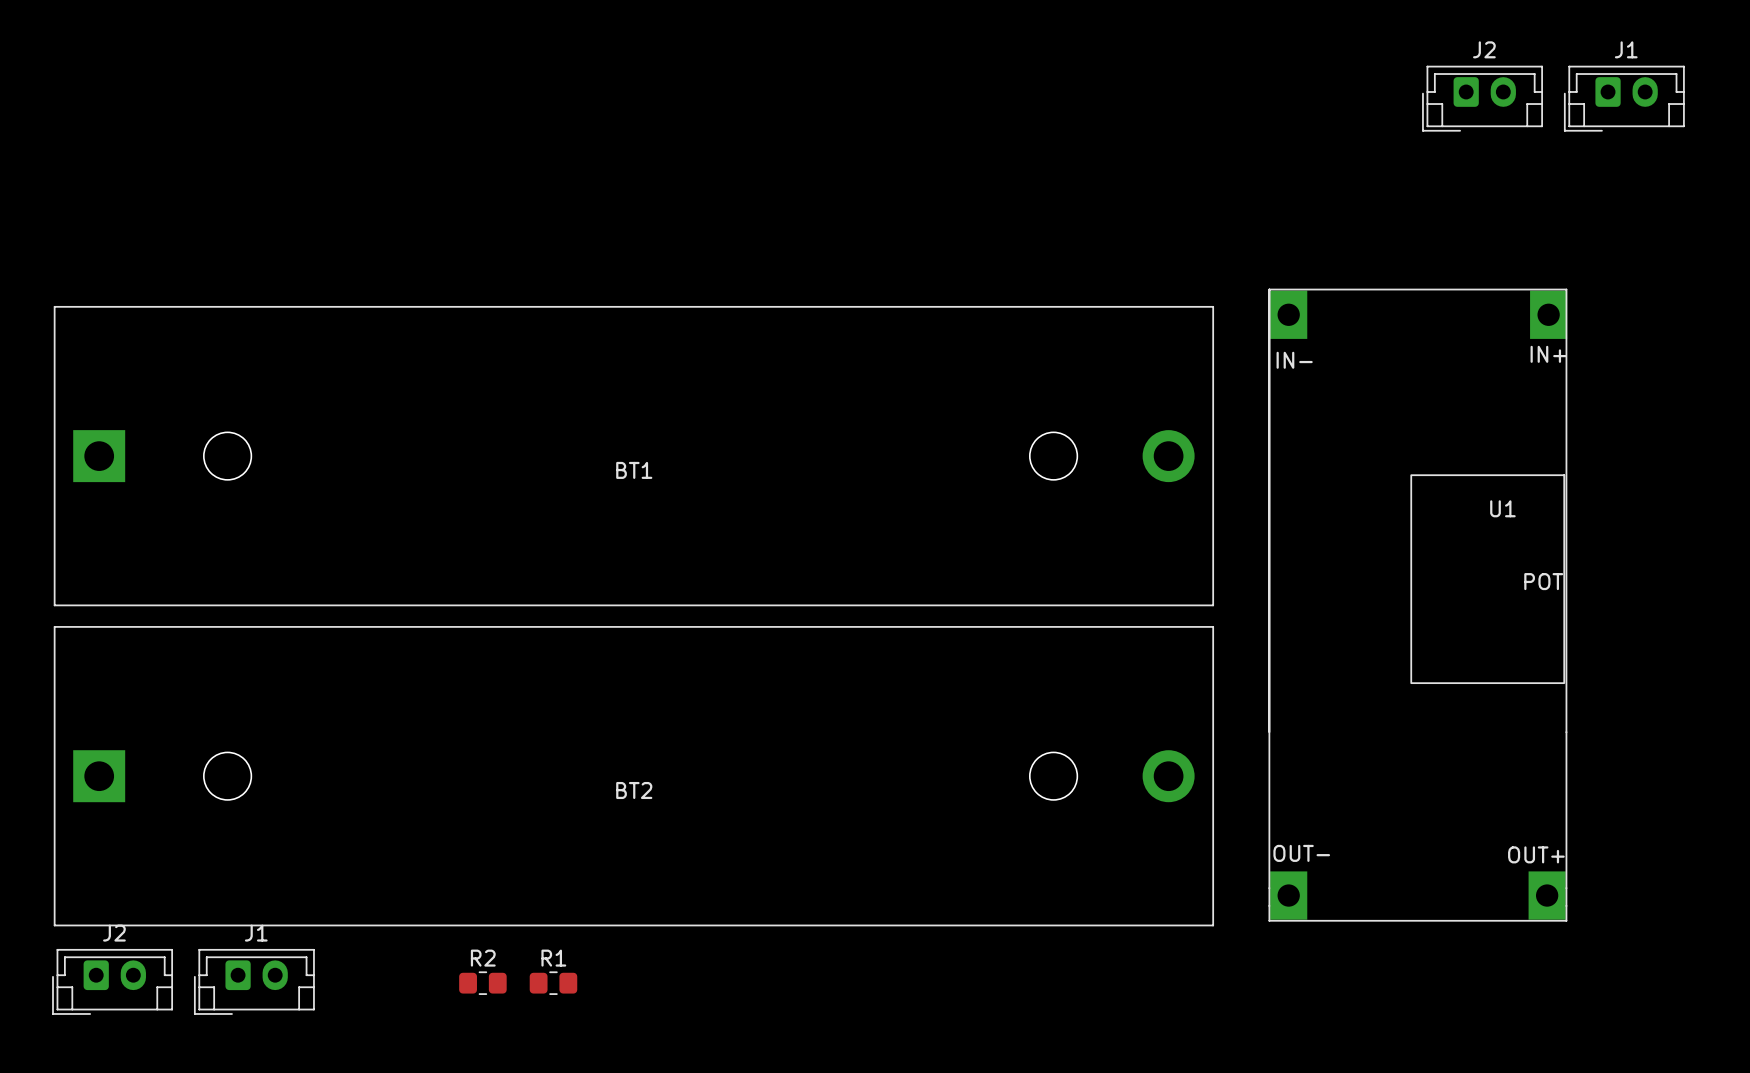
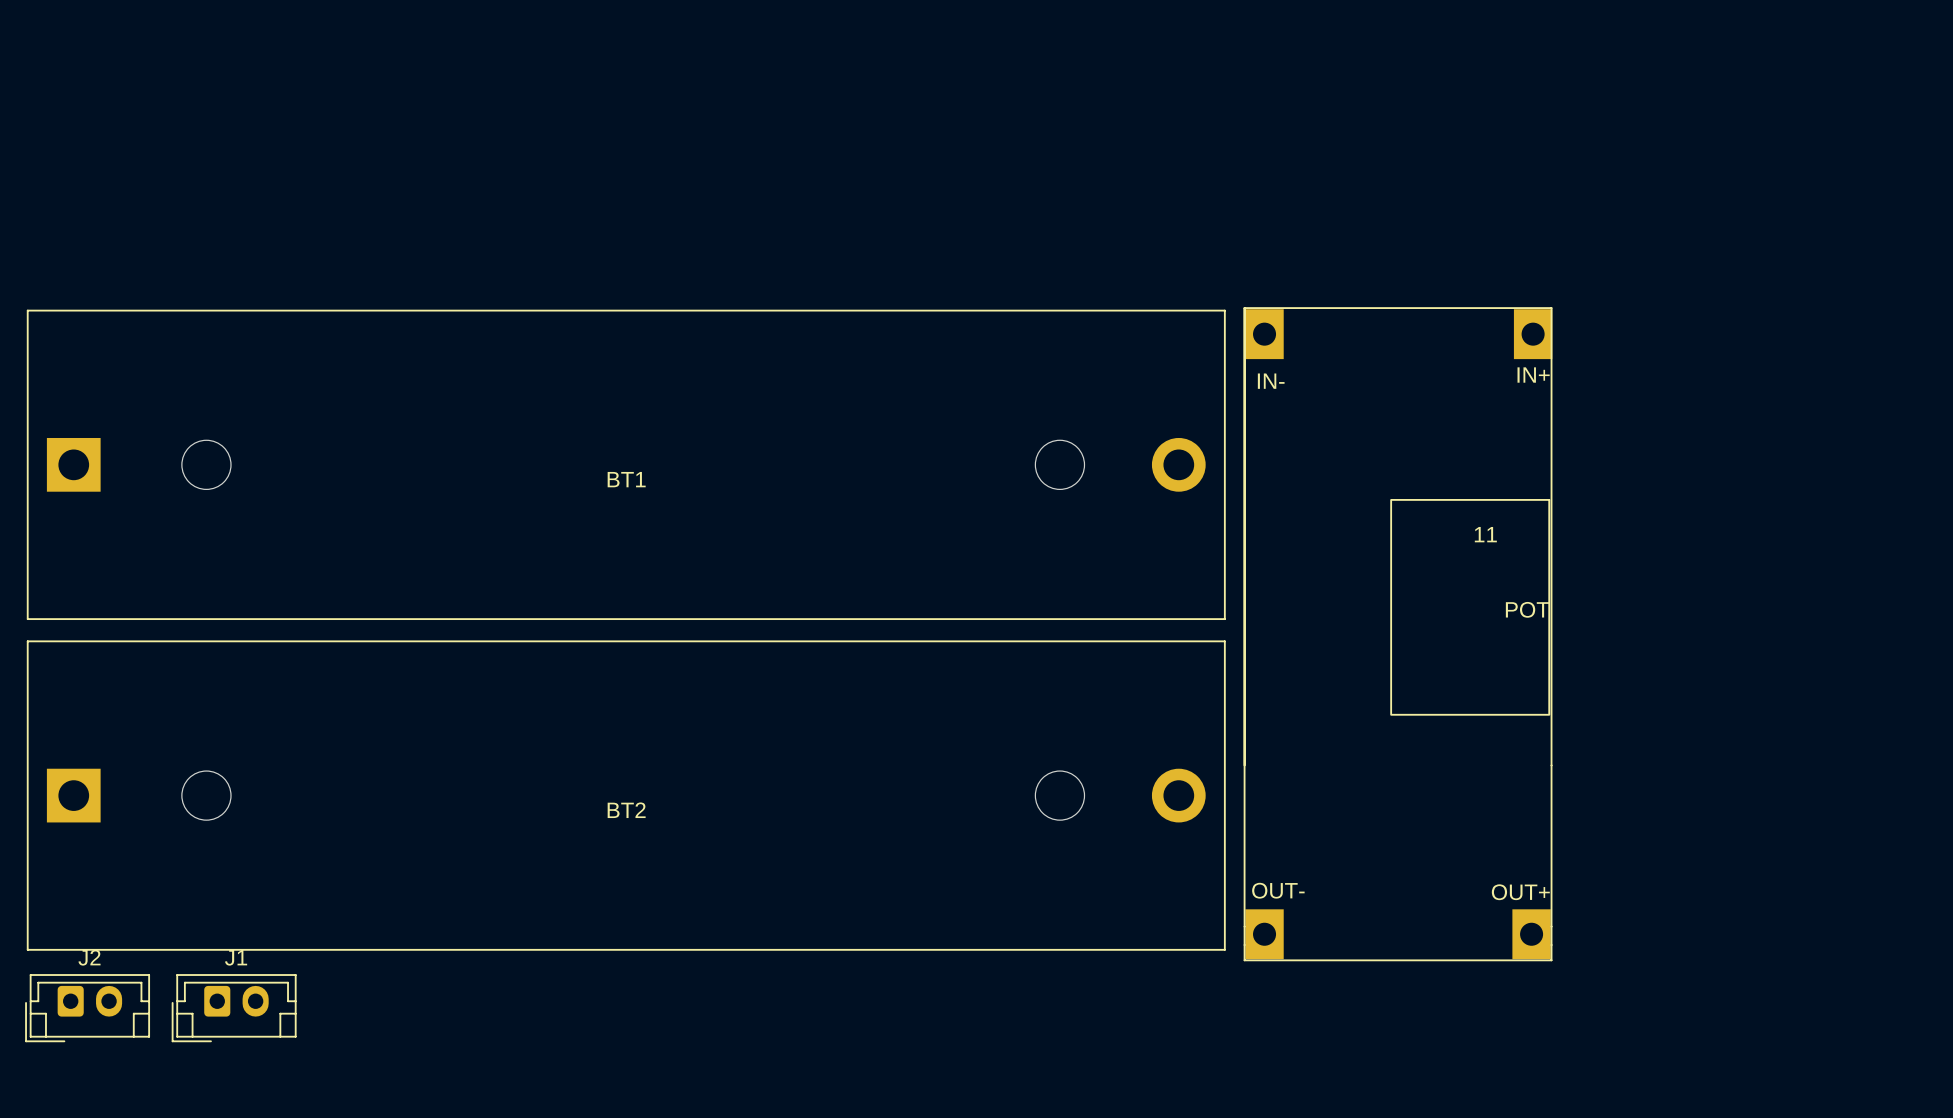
J2: (1482, 98) -> none
J1: (1624, 98) -> none
U1: (1417, 605) -> none
11: none -> (1398, 634)
R2: (482, 983) -> none
R1: (553, 983) -> none

